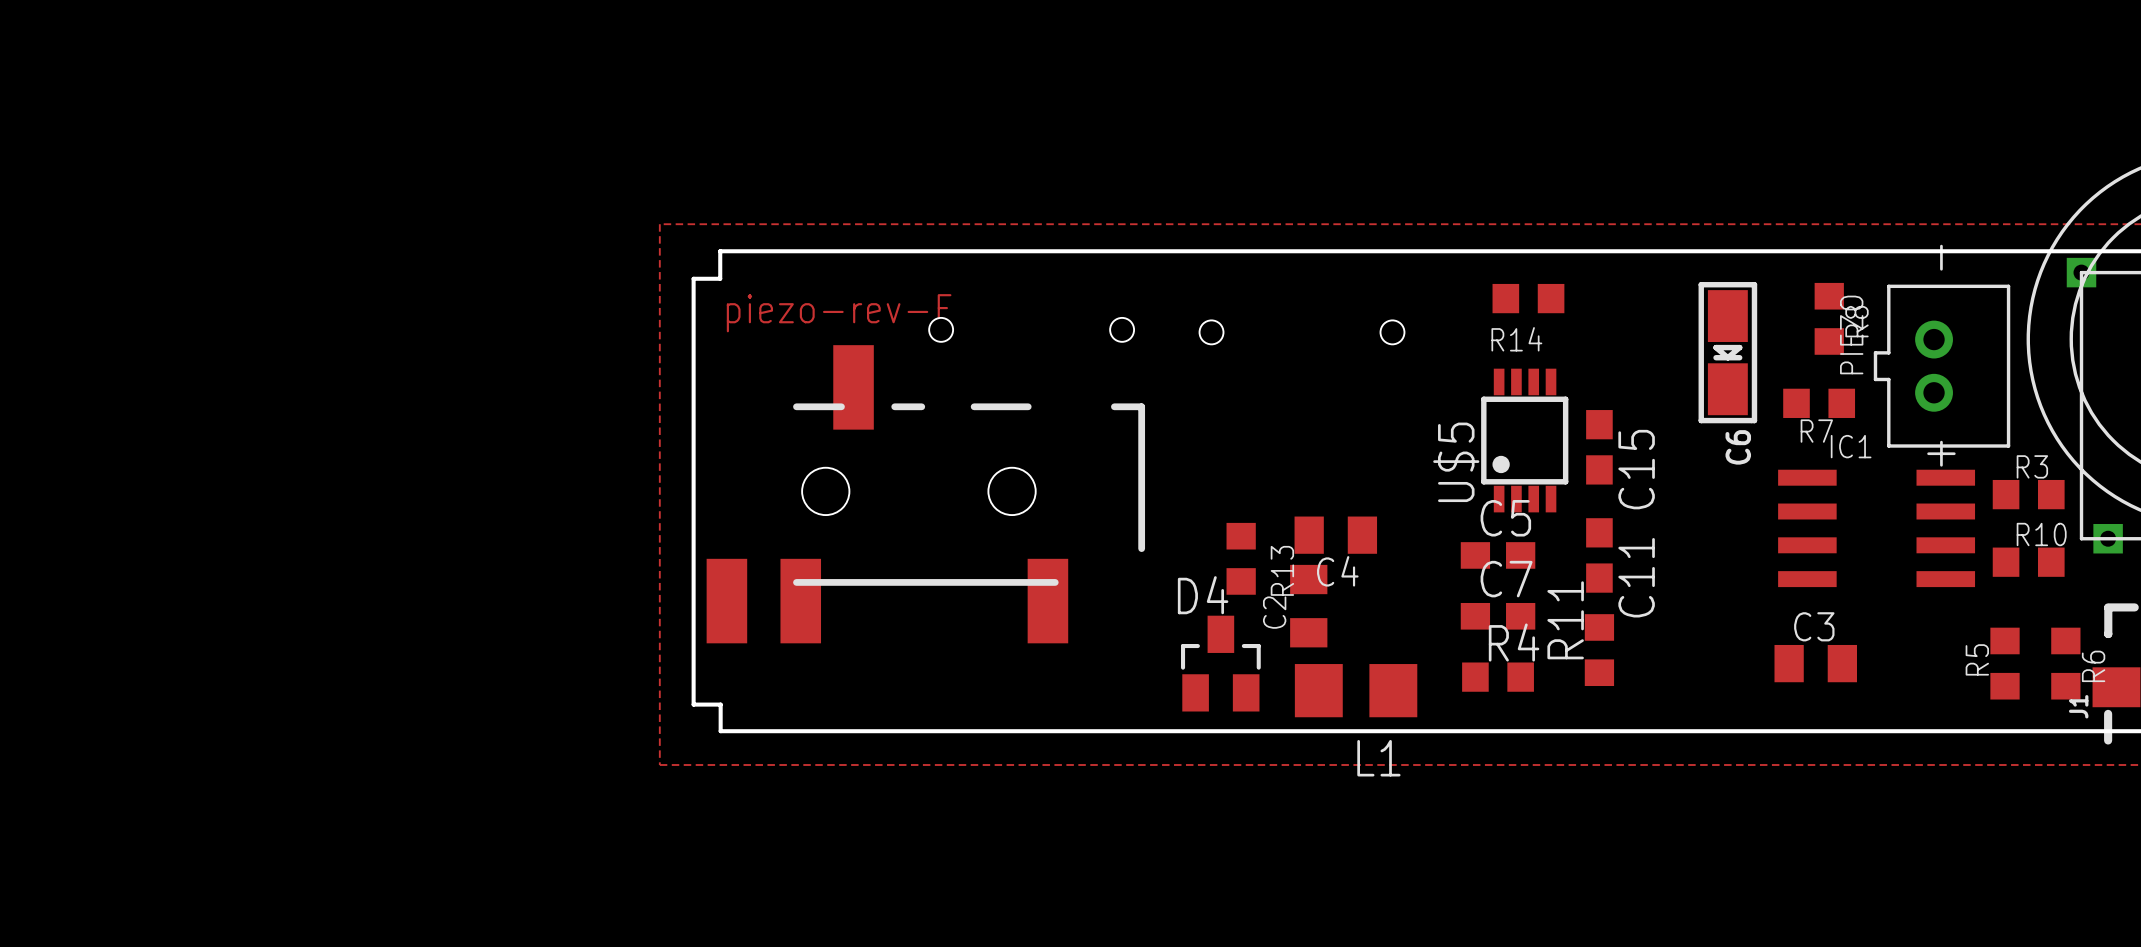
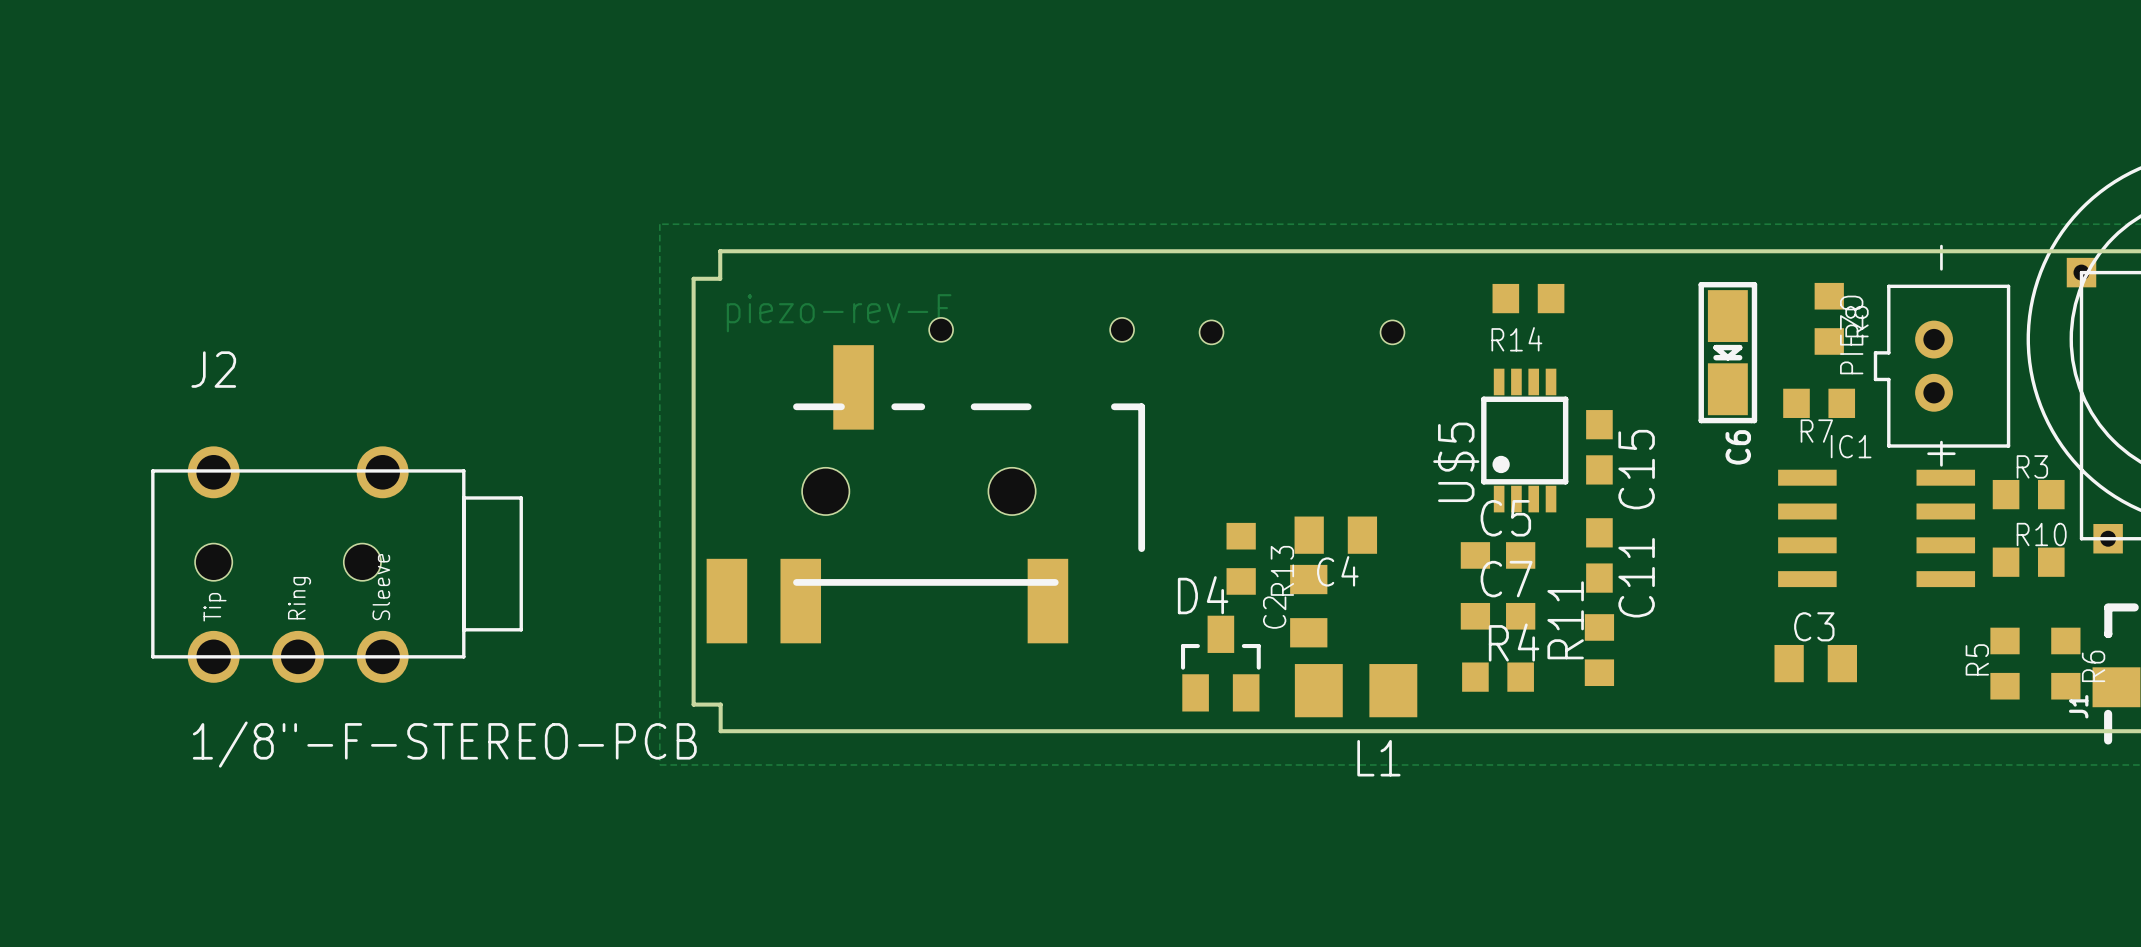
J2: none -> 1/8"-F-STEREO-PCB (337, 564)

